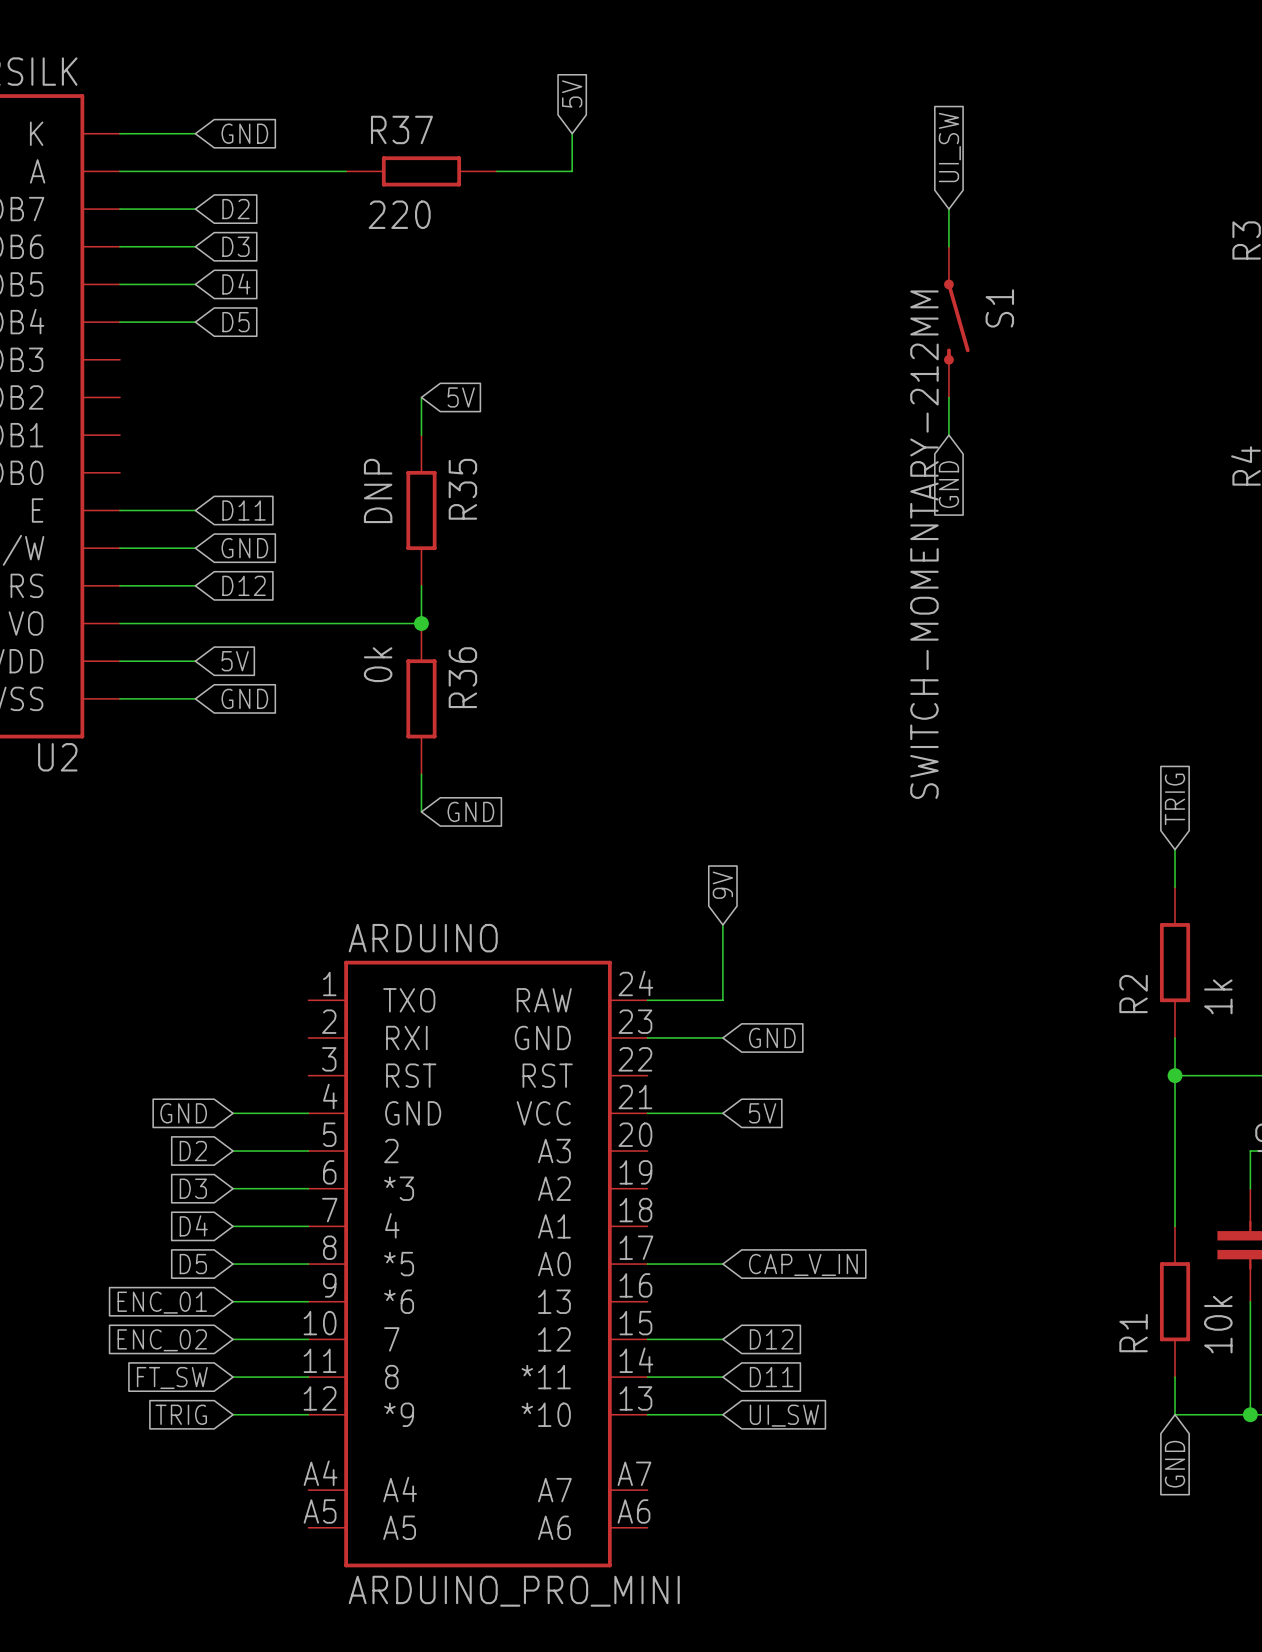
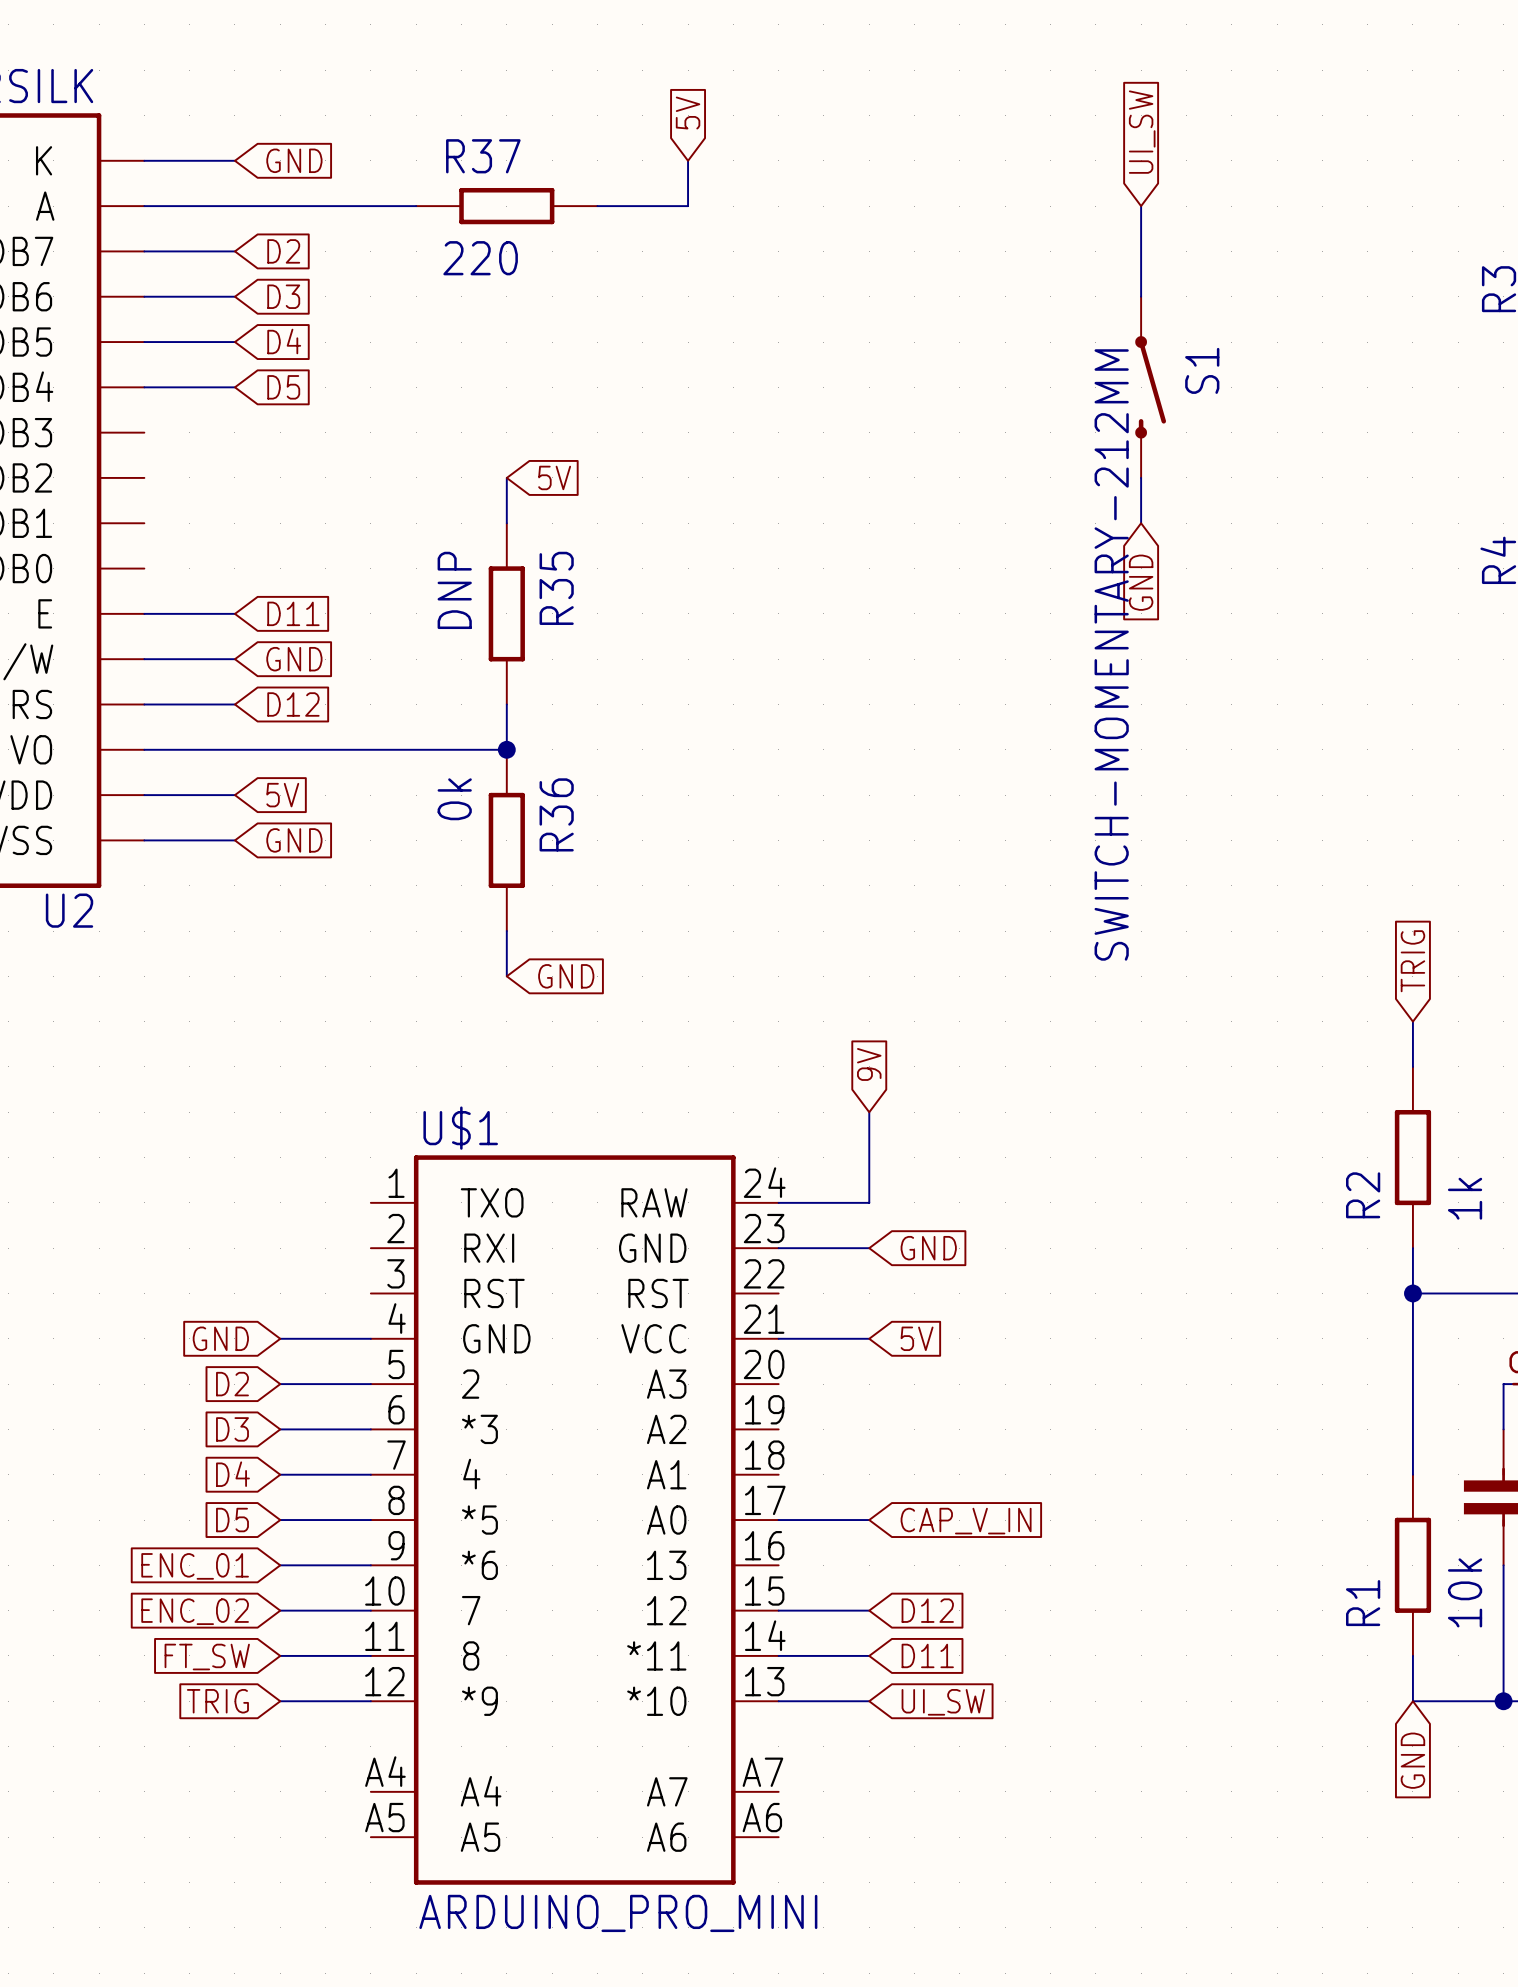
global label position: UI_SW (949, 147) -> UI_SW (1142, 132)
wire: none -> (1141, 206) (1141, 251)
ARDUINO name: ARDUINO (423, 938) -> U$1 (460, 1128)

